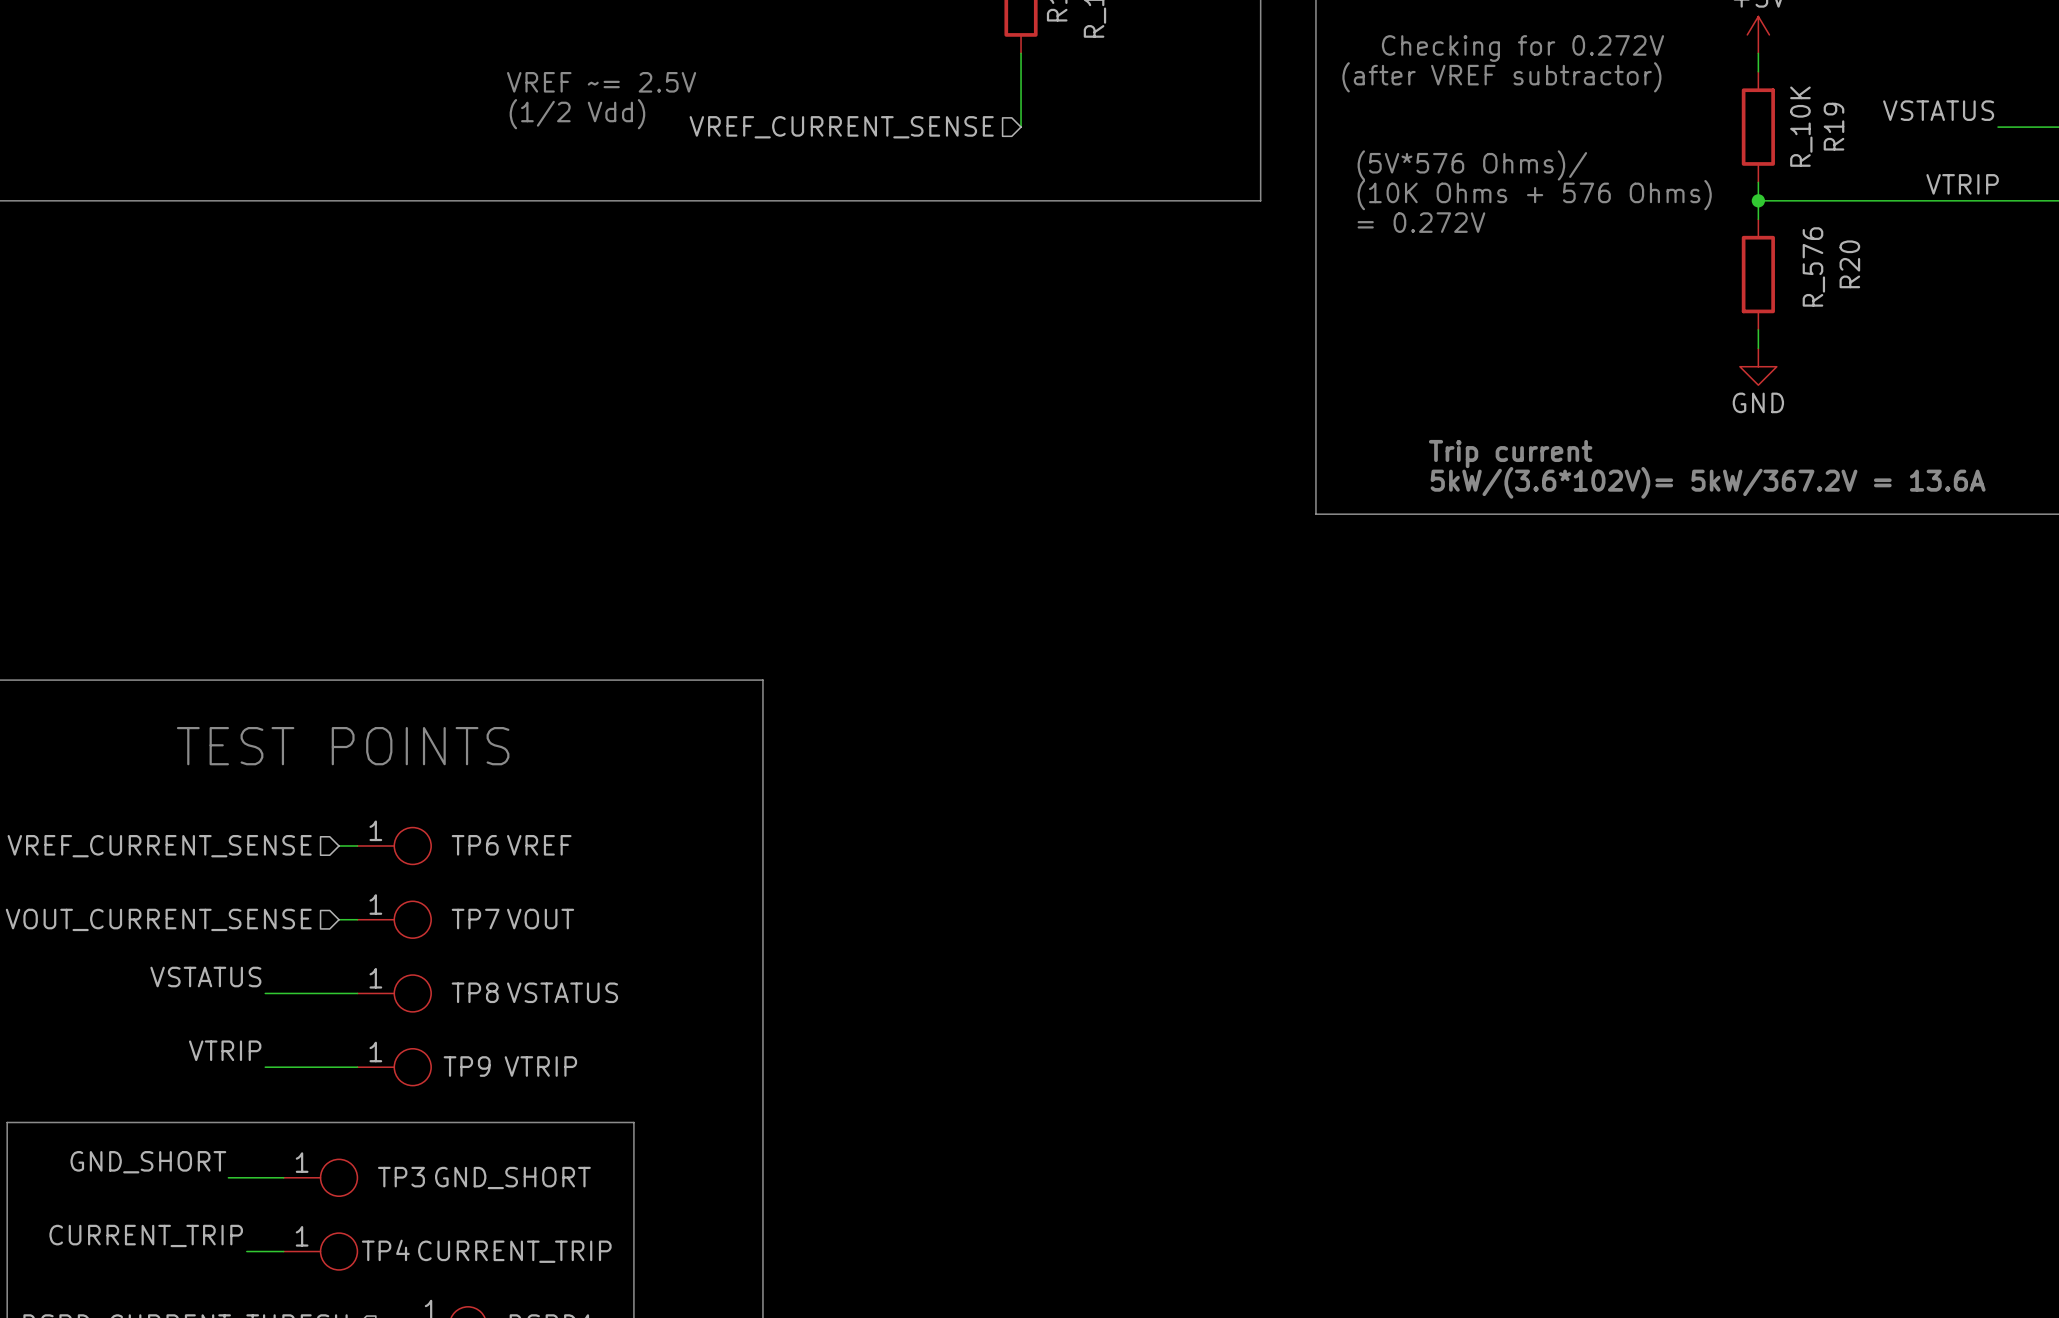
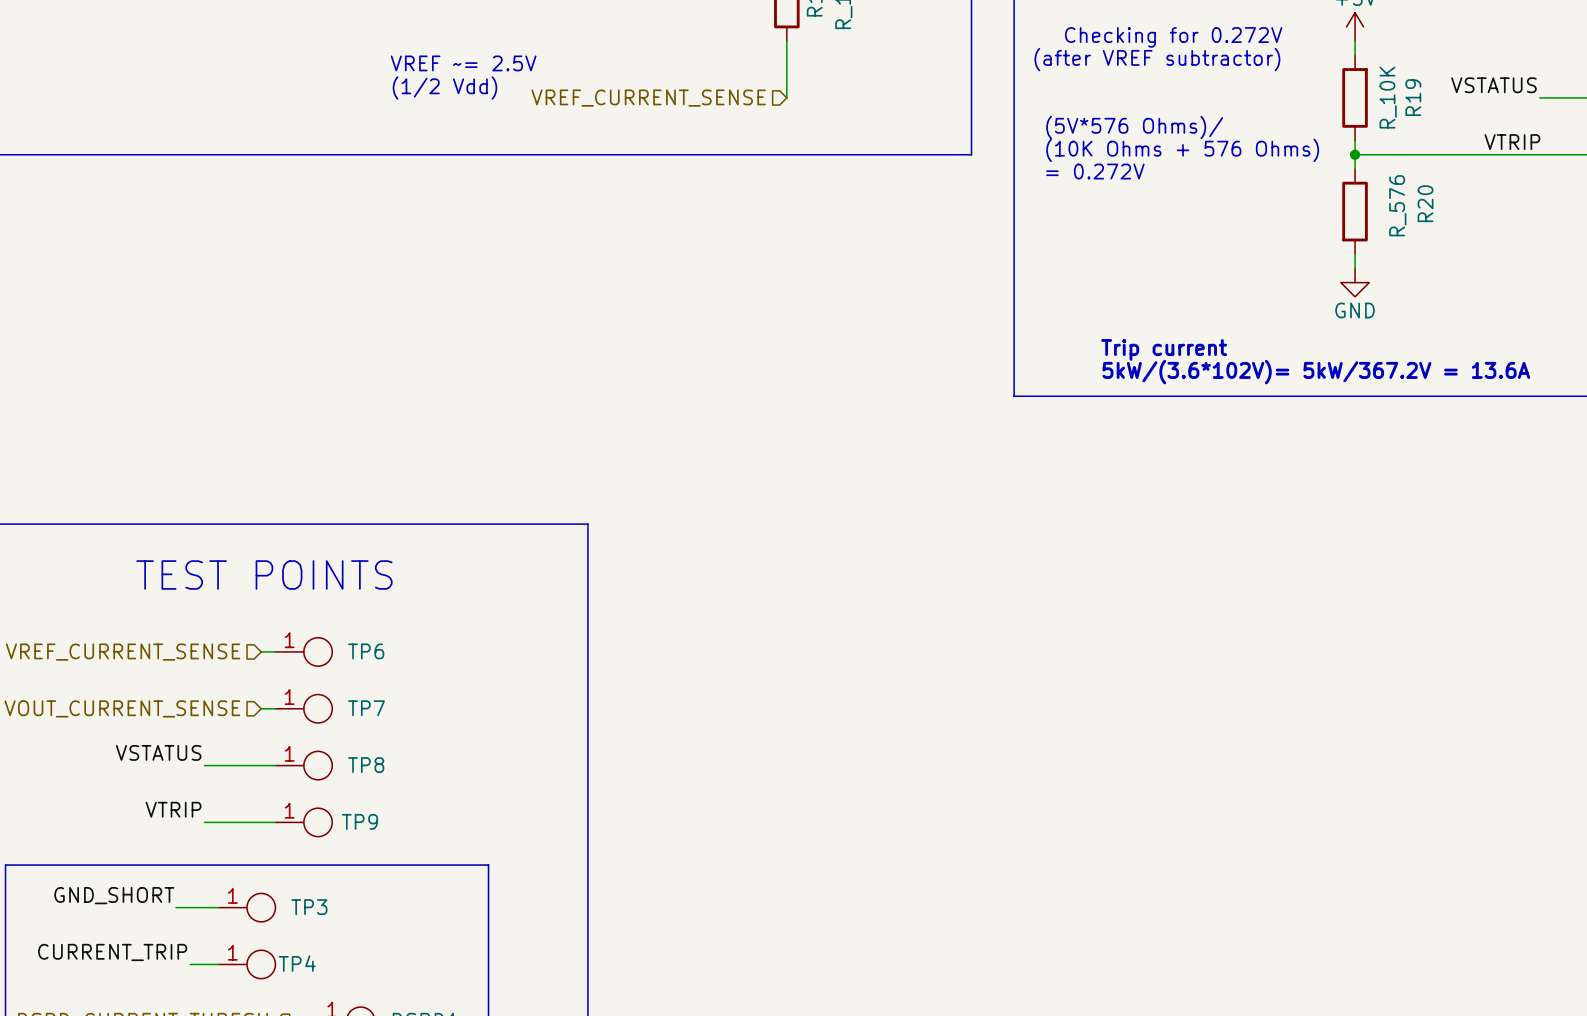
TP6 value: VREF (539, 845) -> none
TP7 value: VOUT (540, 919) -> none
TP8 value: VSTATUS (562, 992) -> none
TP9 value: VTRIP (540, 1066) -> none
TP3 value: GND_SHORT (512, 1177) -> none
TP4 value: CURRENT_TRIP (514, 1251) -> none

